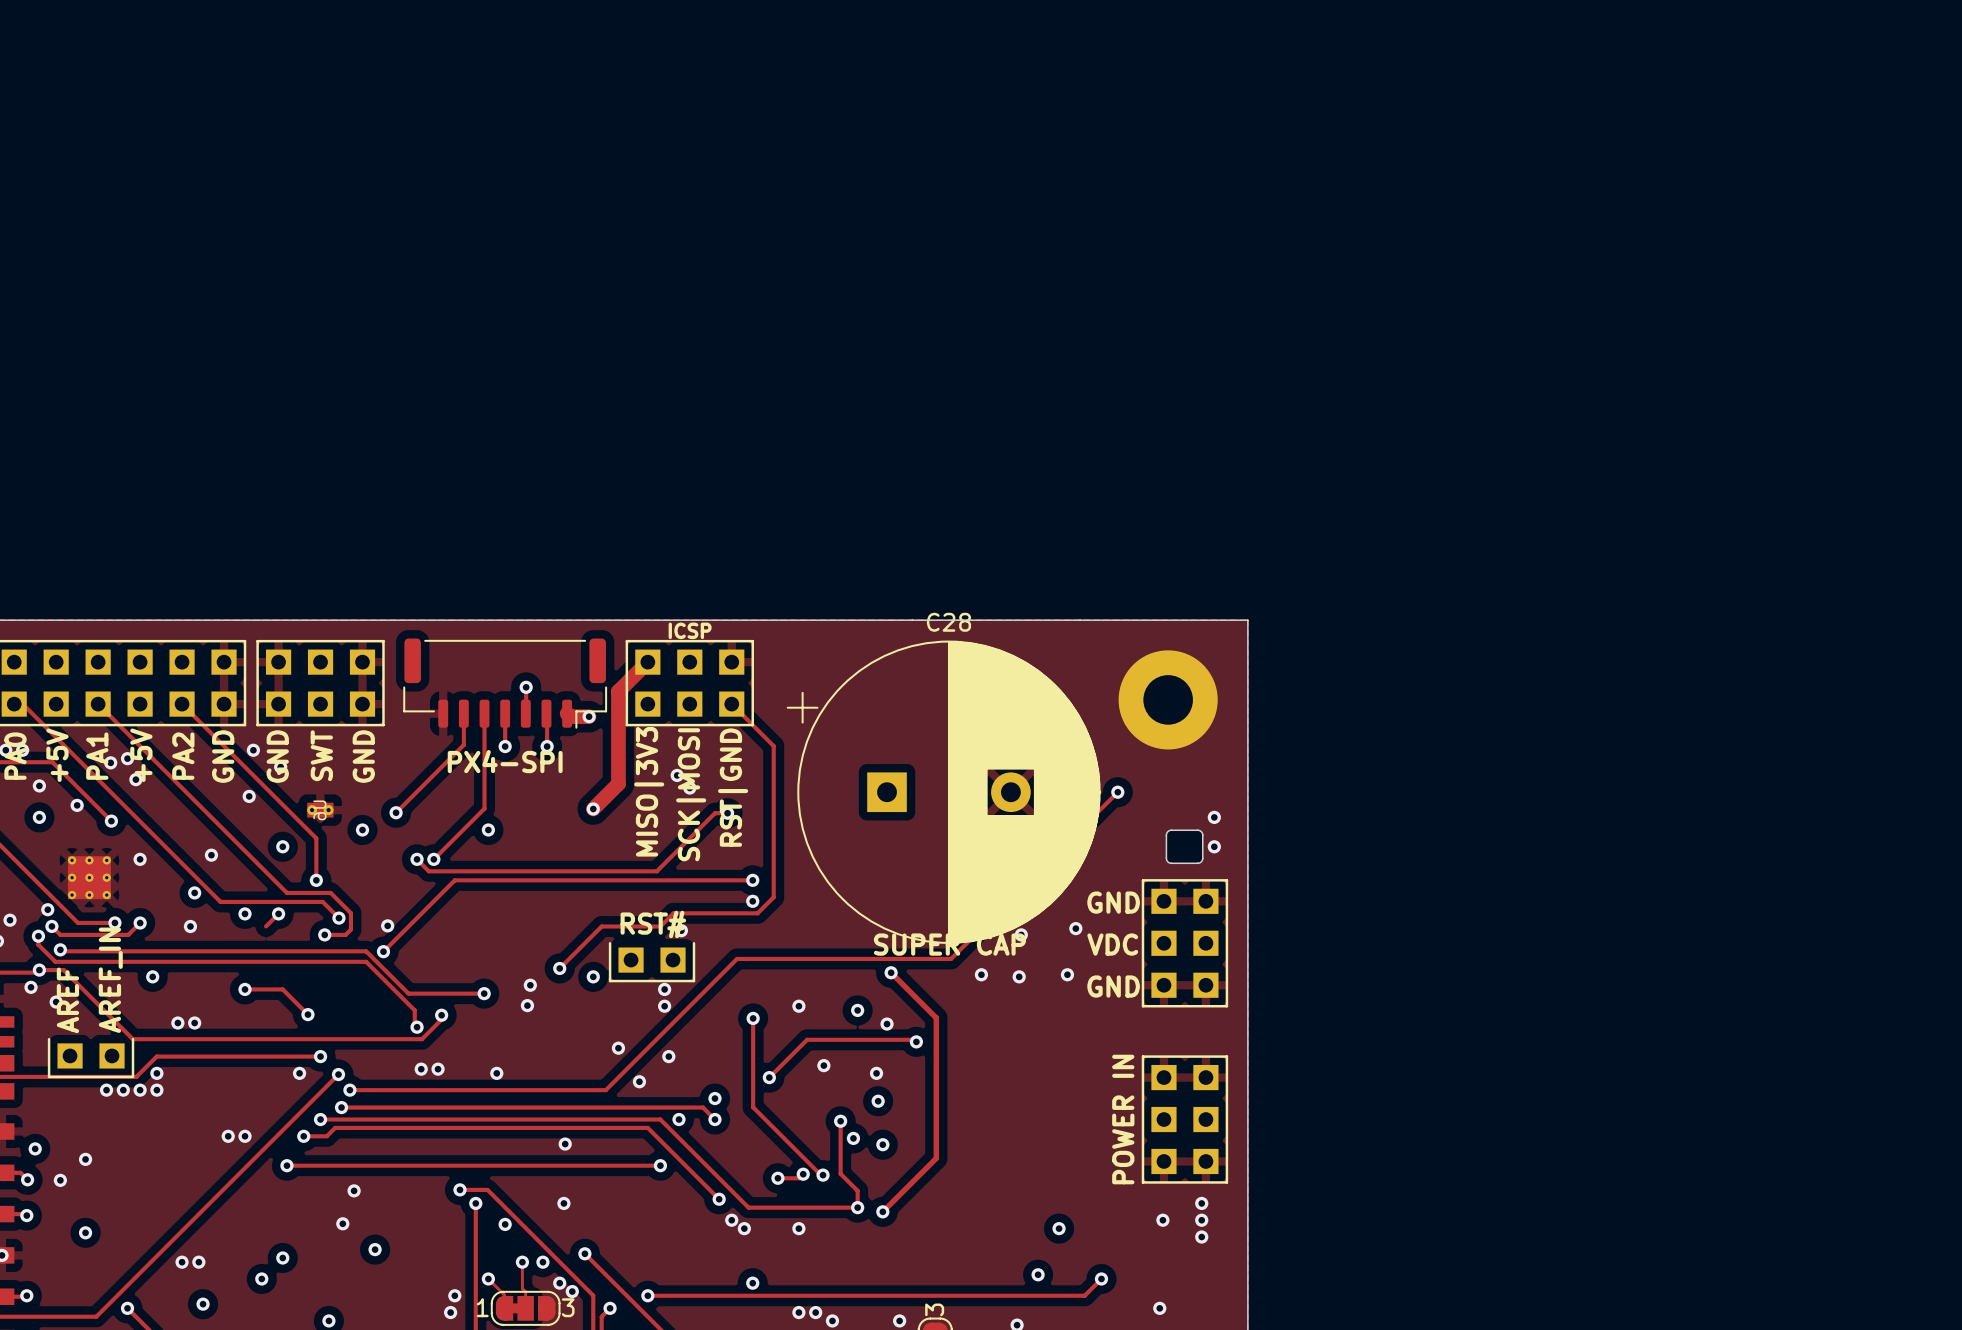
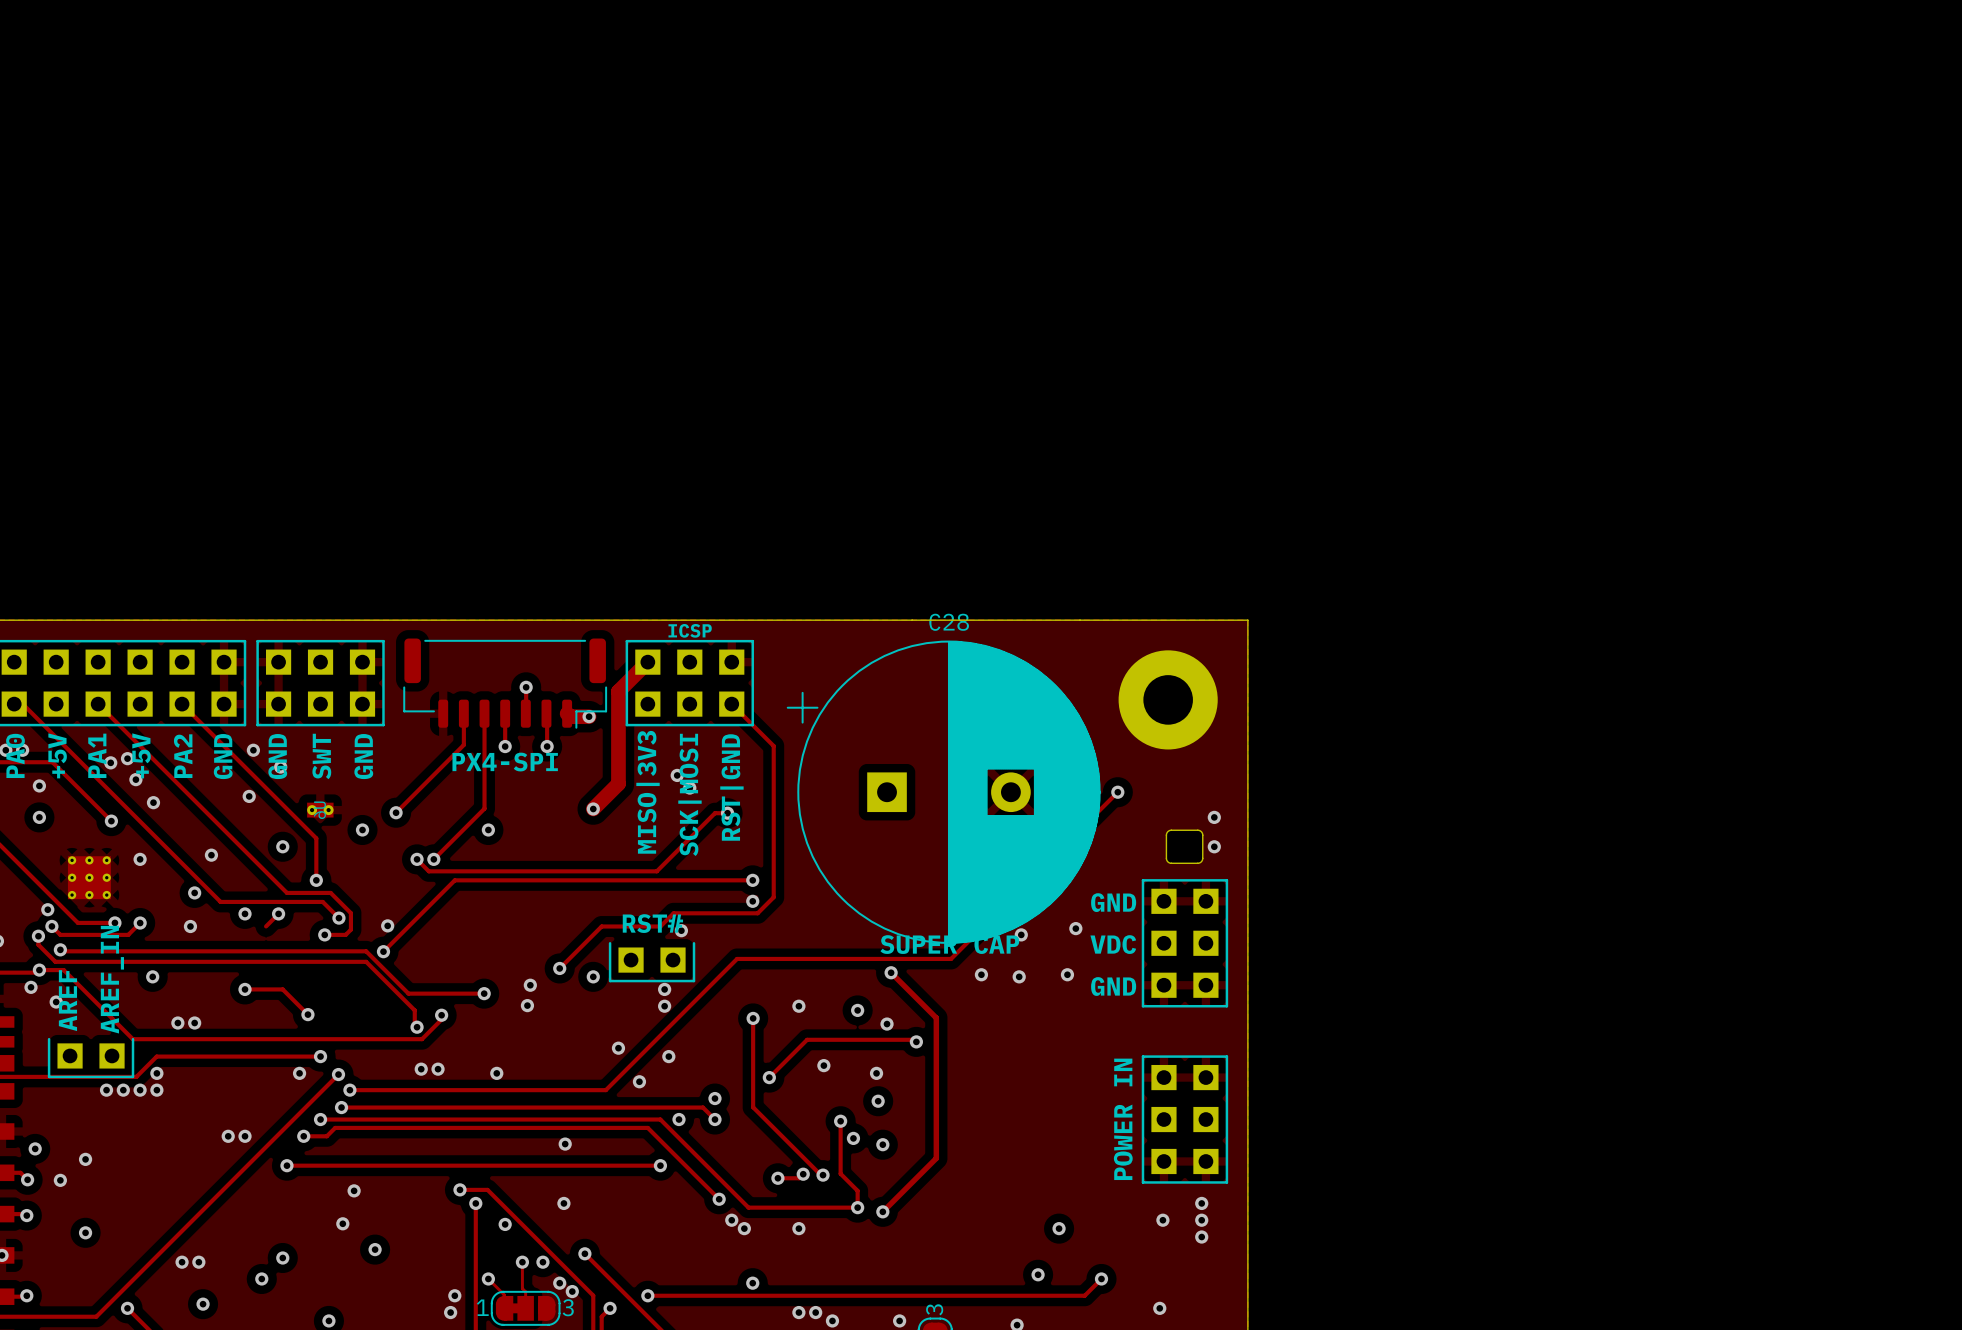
via position: (77, 805) -> (153, 802)
via: (10, 920) -> none

